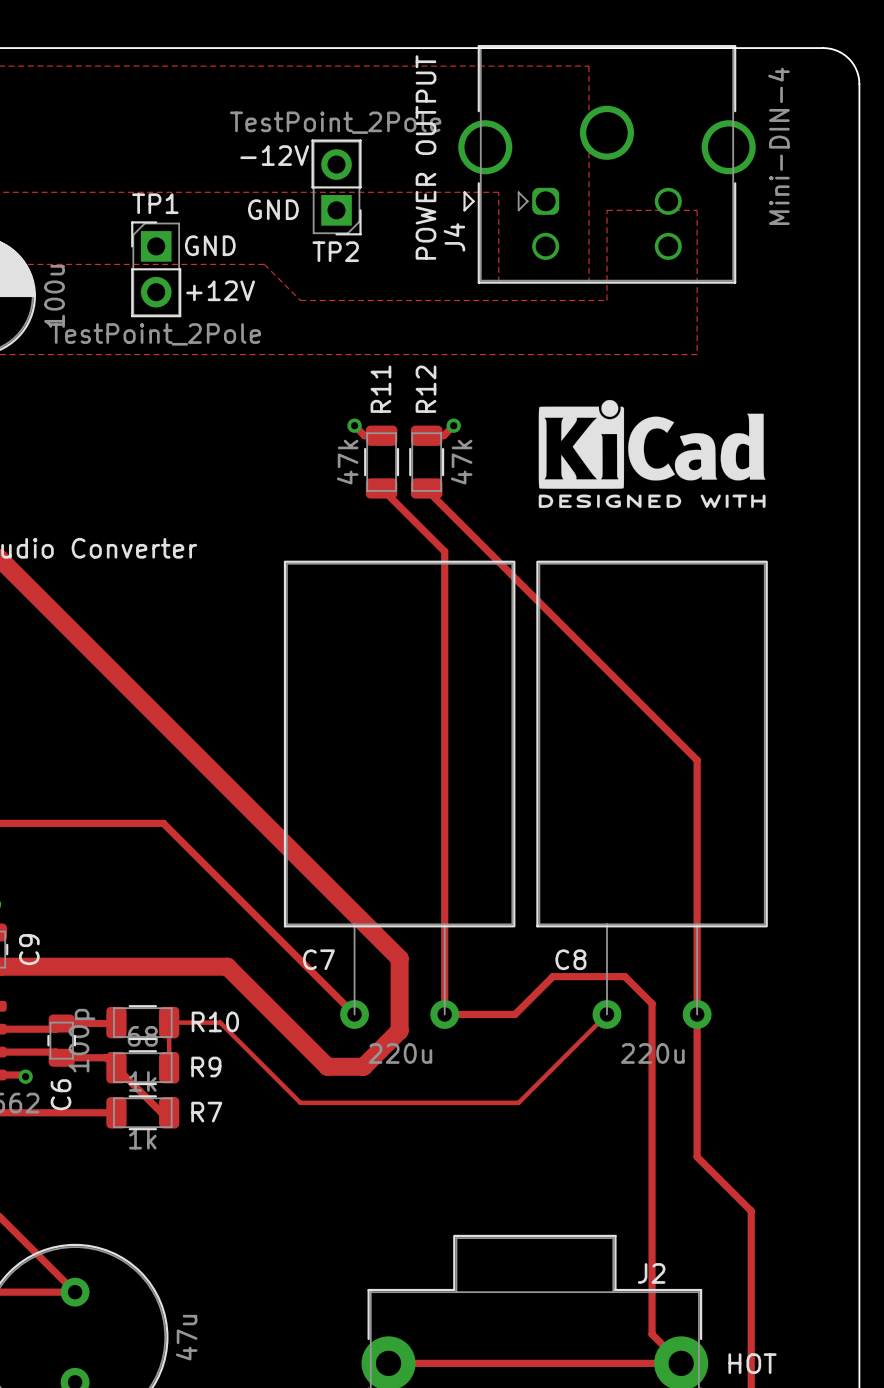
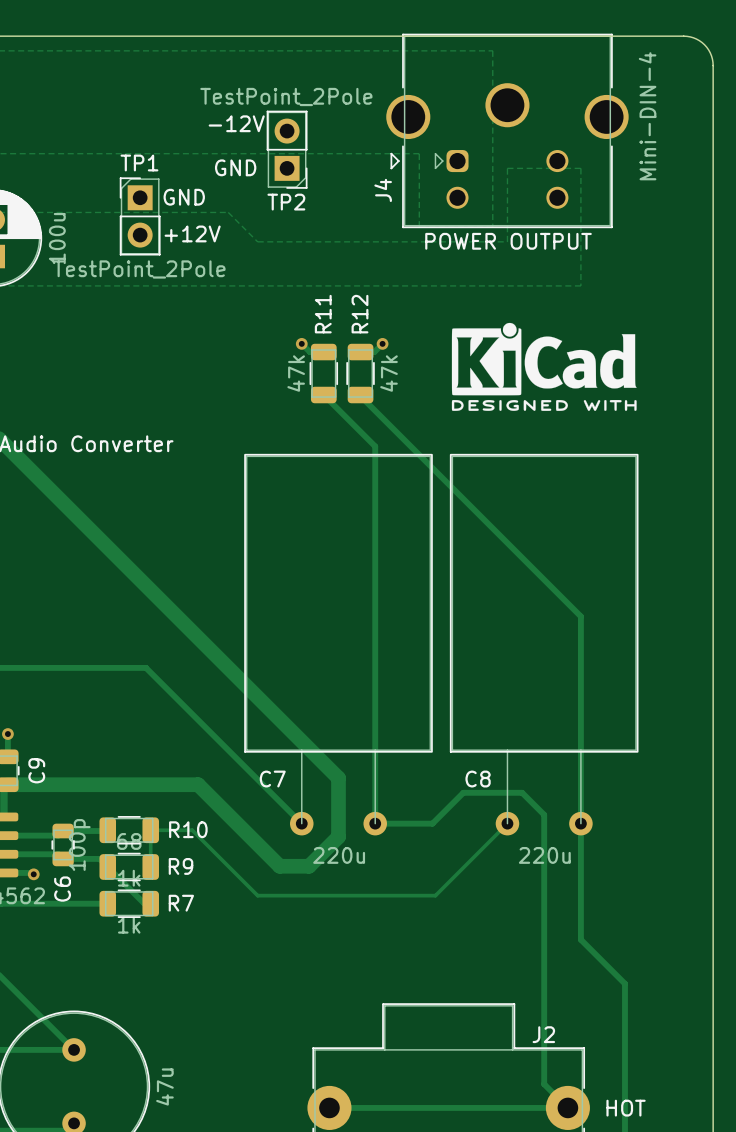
J4 text rotation: 0° (426, 157) -> 90° clockwise (508, 241)

